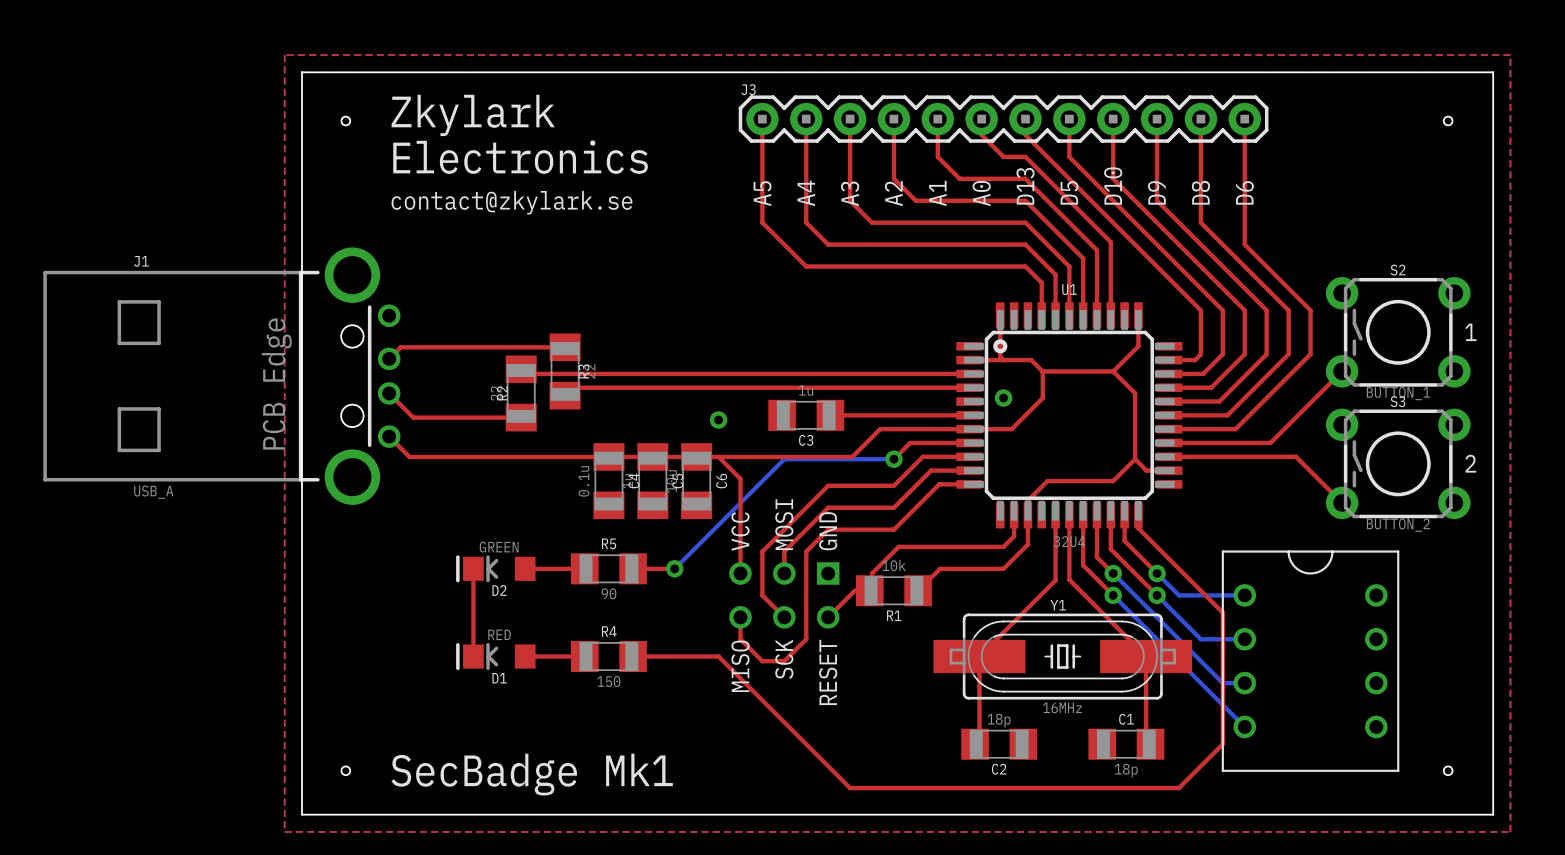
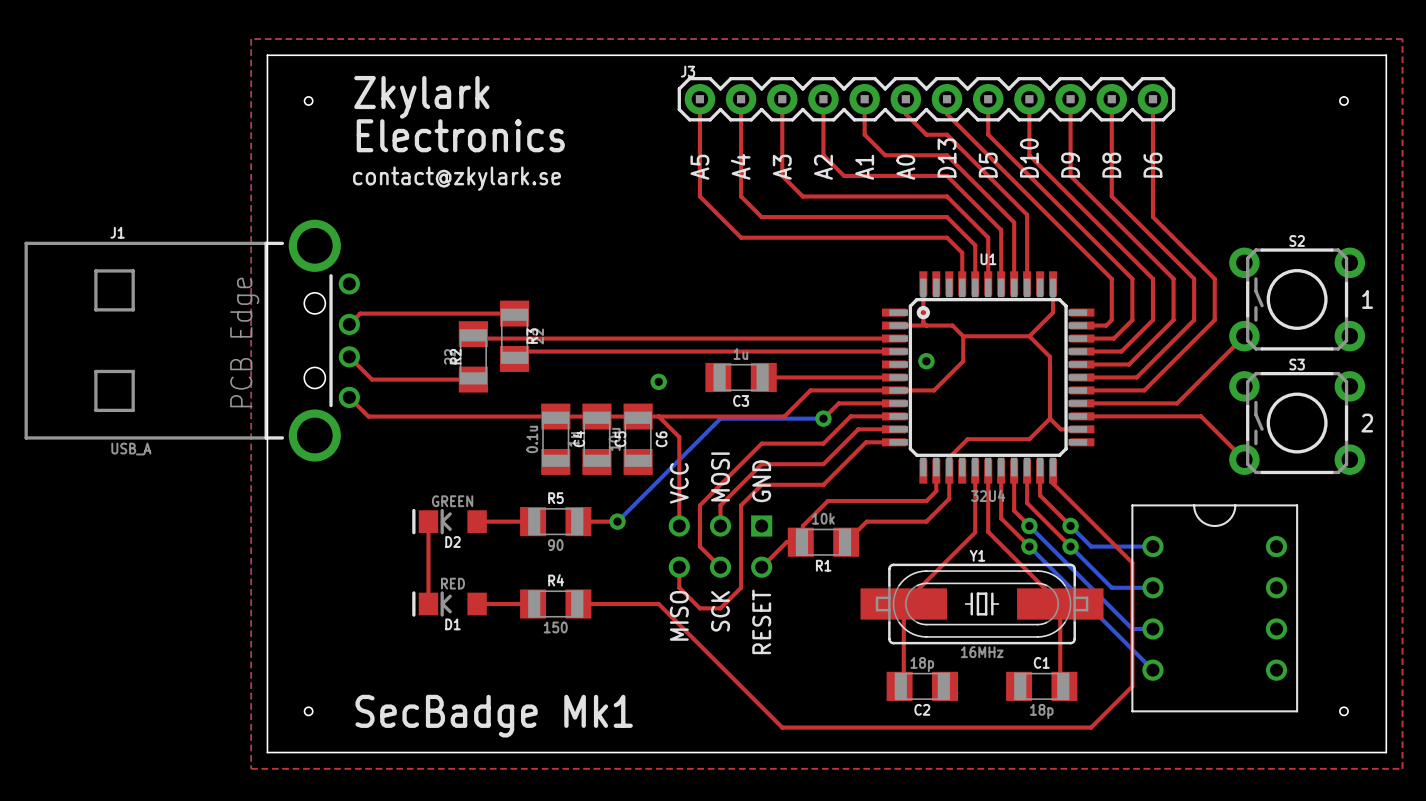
S2 value: BUTTON_1 (1398, 393) -> none
S3 value: BUTTON_2 (1398, 525) -> none

